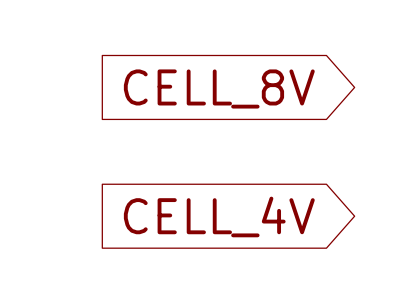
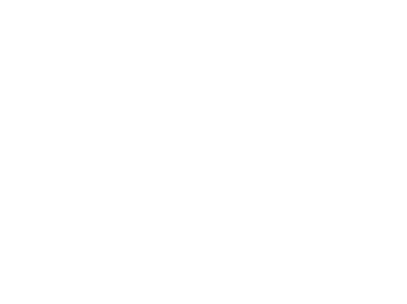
global label: CELL_8V (219, 88) -> none
global label: CELL_4V (219, 216) -> none

